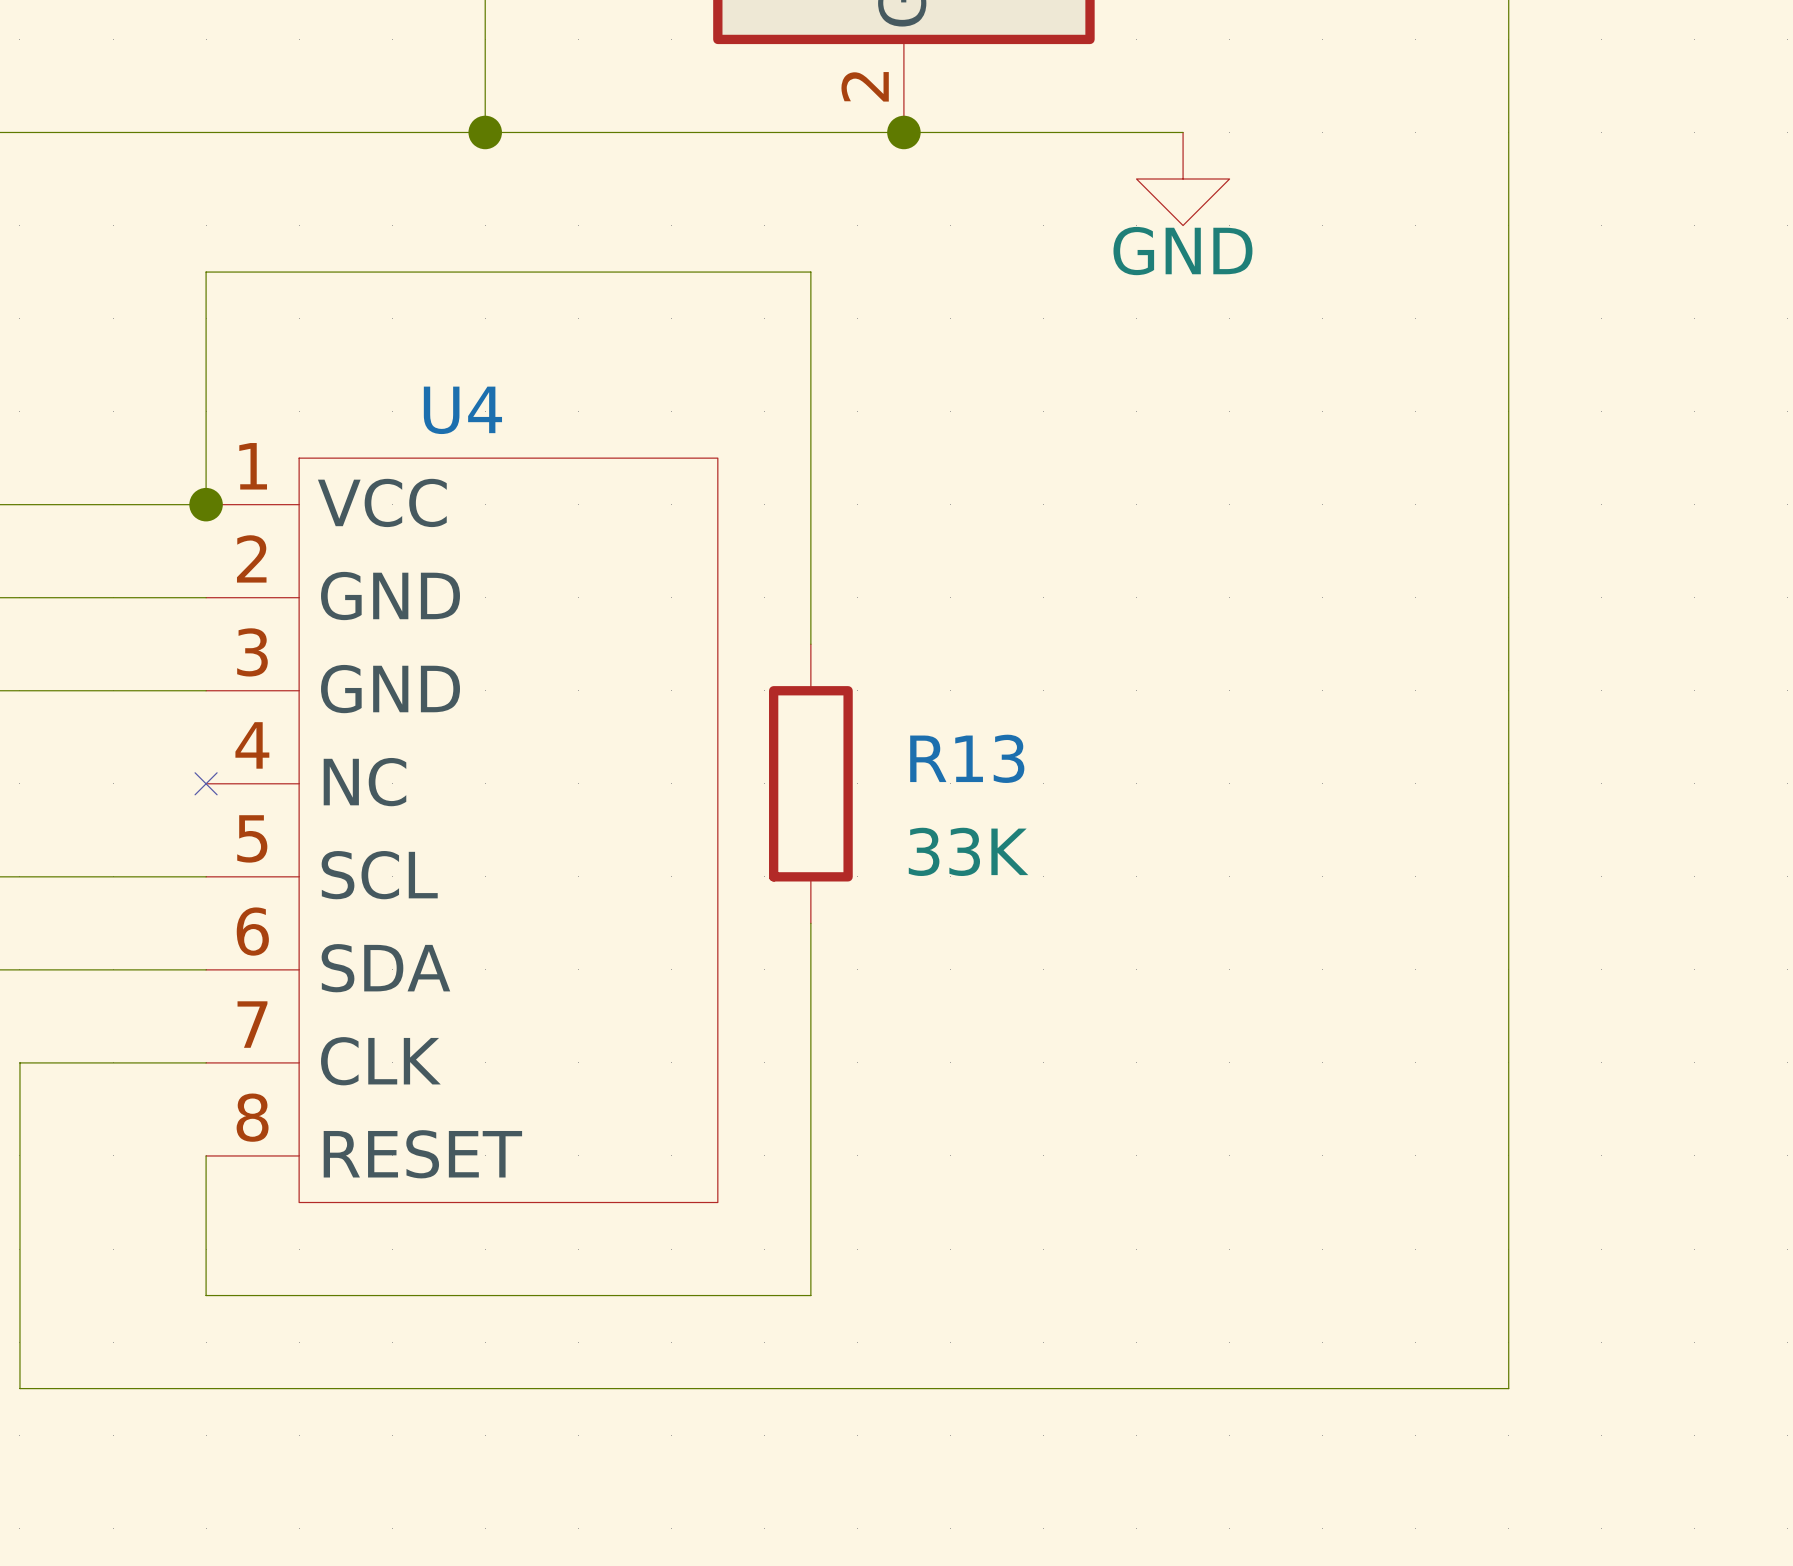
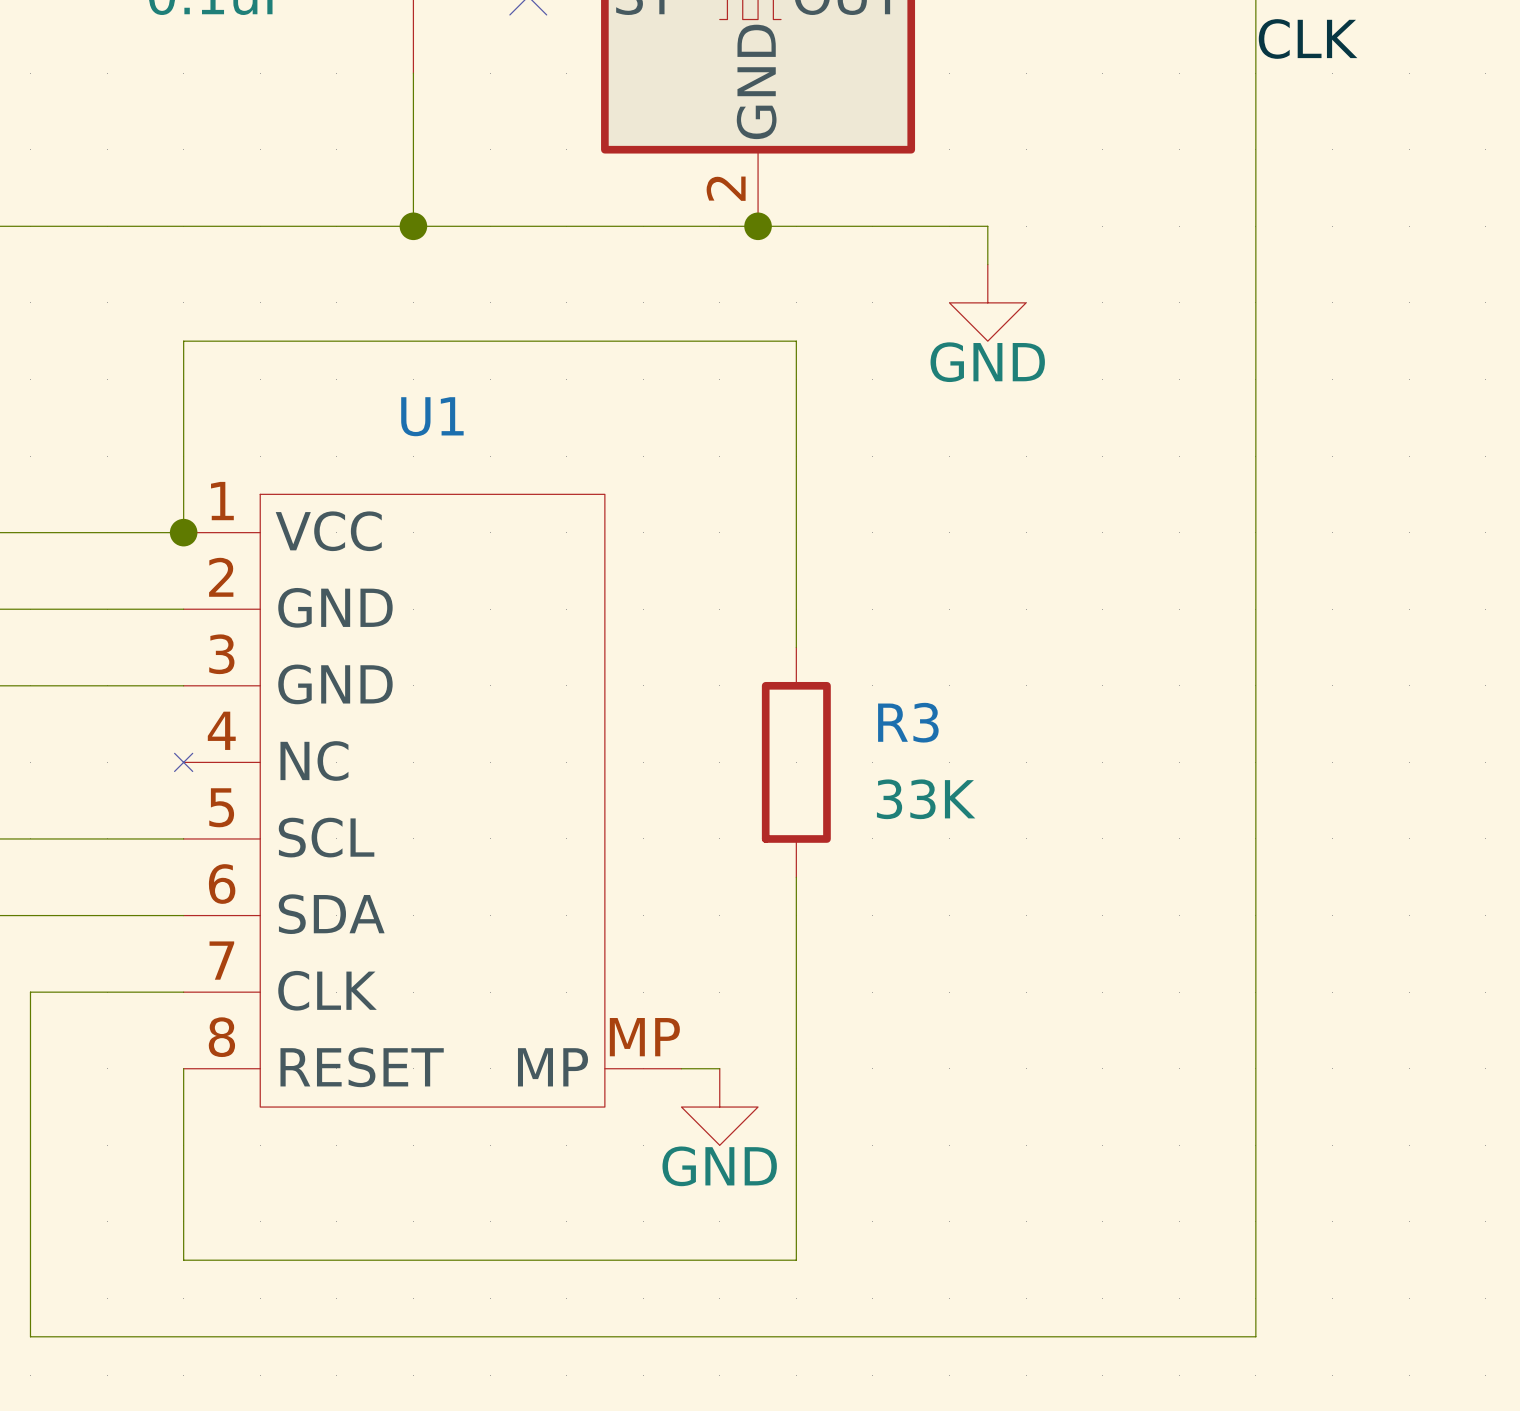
power symbol position: GND (1183, 179) -> GND (987, 302)
wire: (810, 272) (810, 644) -> (681, 341) (796, 341) (796, 647)
R13: 33K (810, 783) -> none
R3: none -> 33K (796, 762)
U4: (456, 830) -> none
U1: none -> (428, 800)
wire: (810, 923) (810, 1295) (206, 1295) -> none
wire: none -> (681, 1068) (719, 1068)
power symbol: none -> GND (719, 1107)
wire: (19, 1388) (206, 1388) -> (183, 1183) (183, 1260)
wire: none -> (30, 1260) (30, 1336) (1255, 1336) (1255, 1260)
wire: (950, 1388) (1508, 1388) -> (796, 1260) (796, 877)

